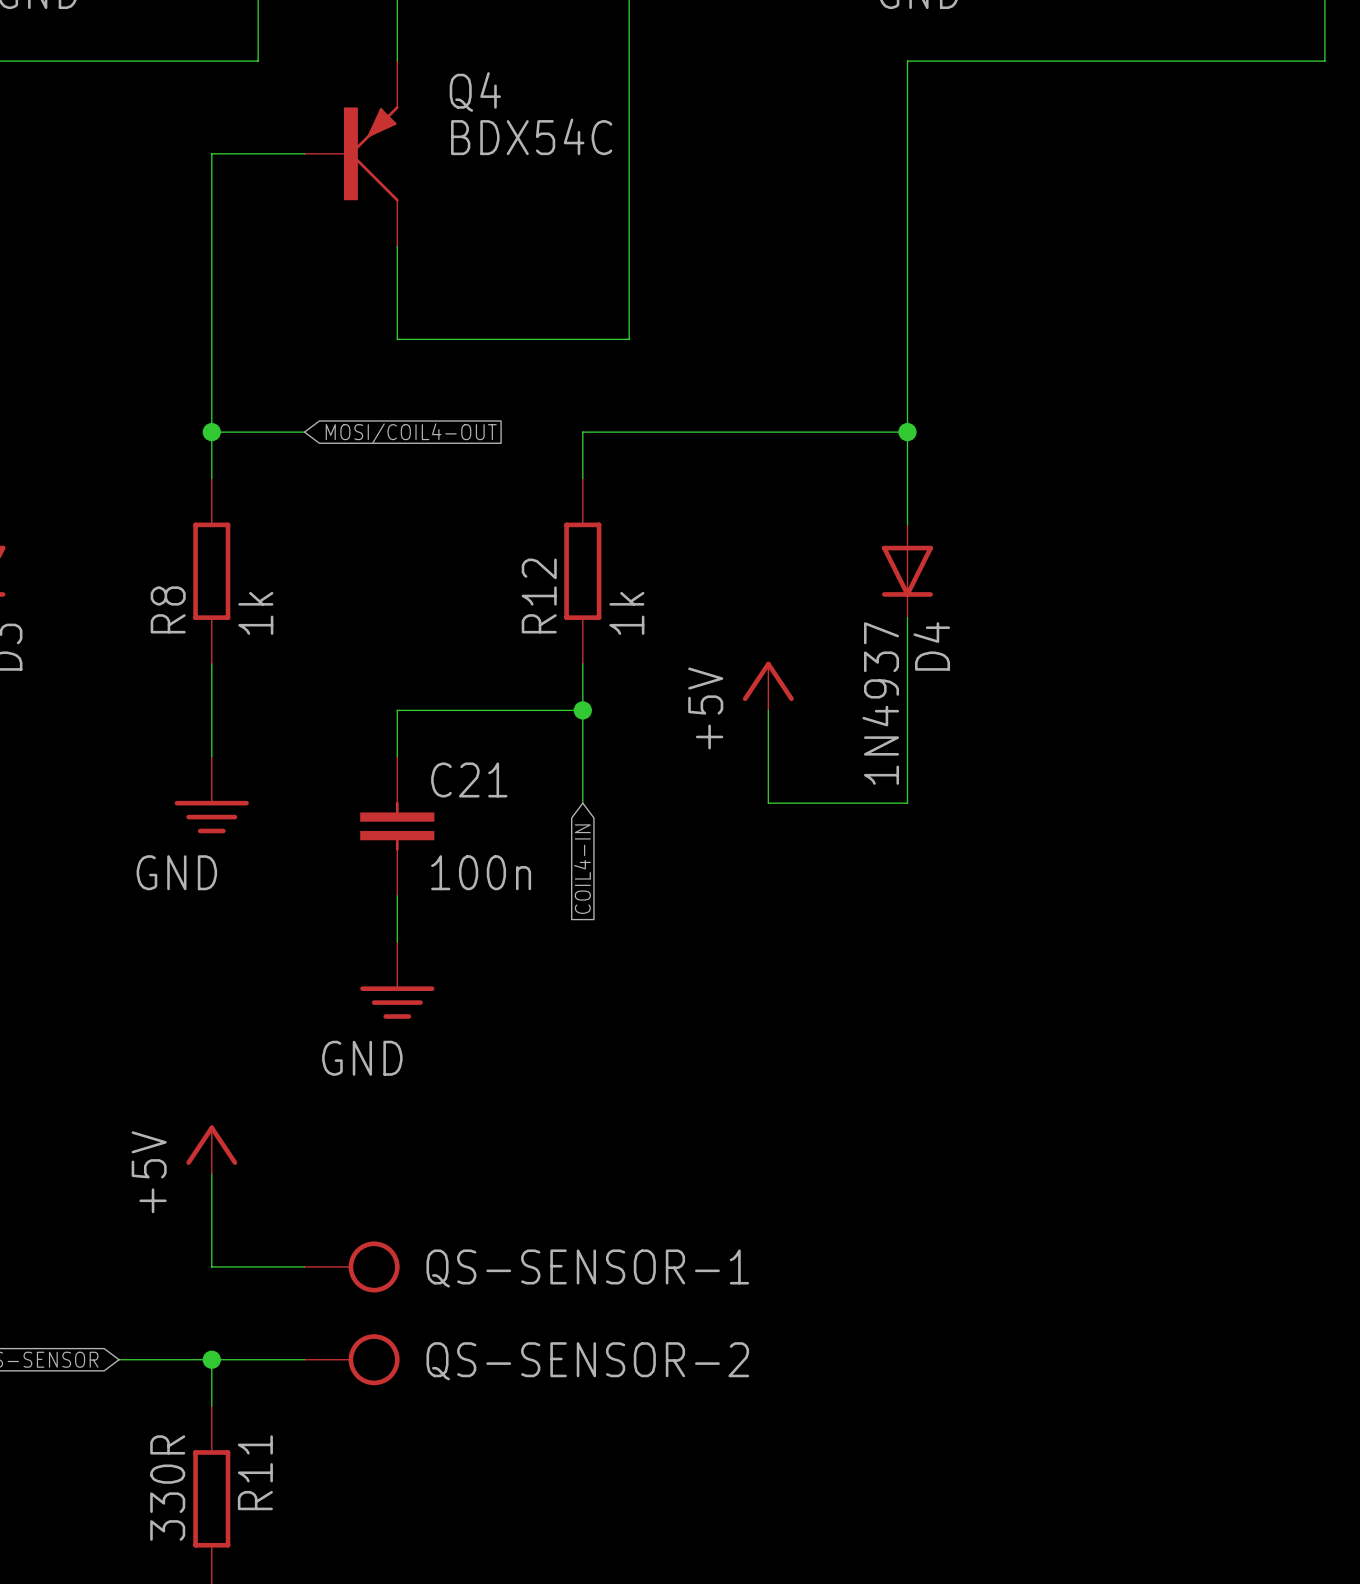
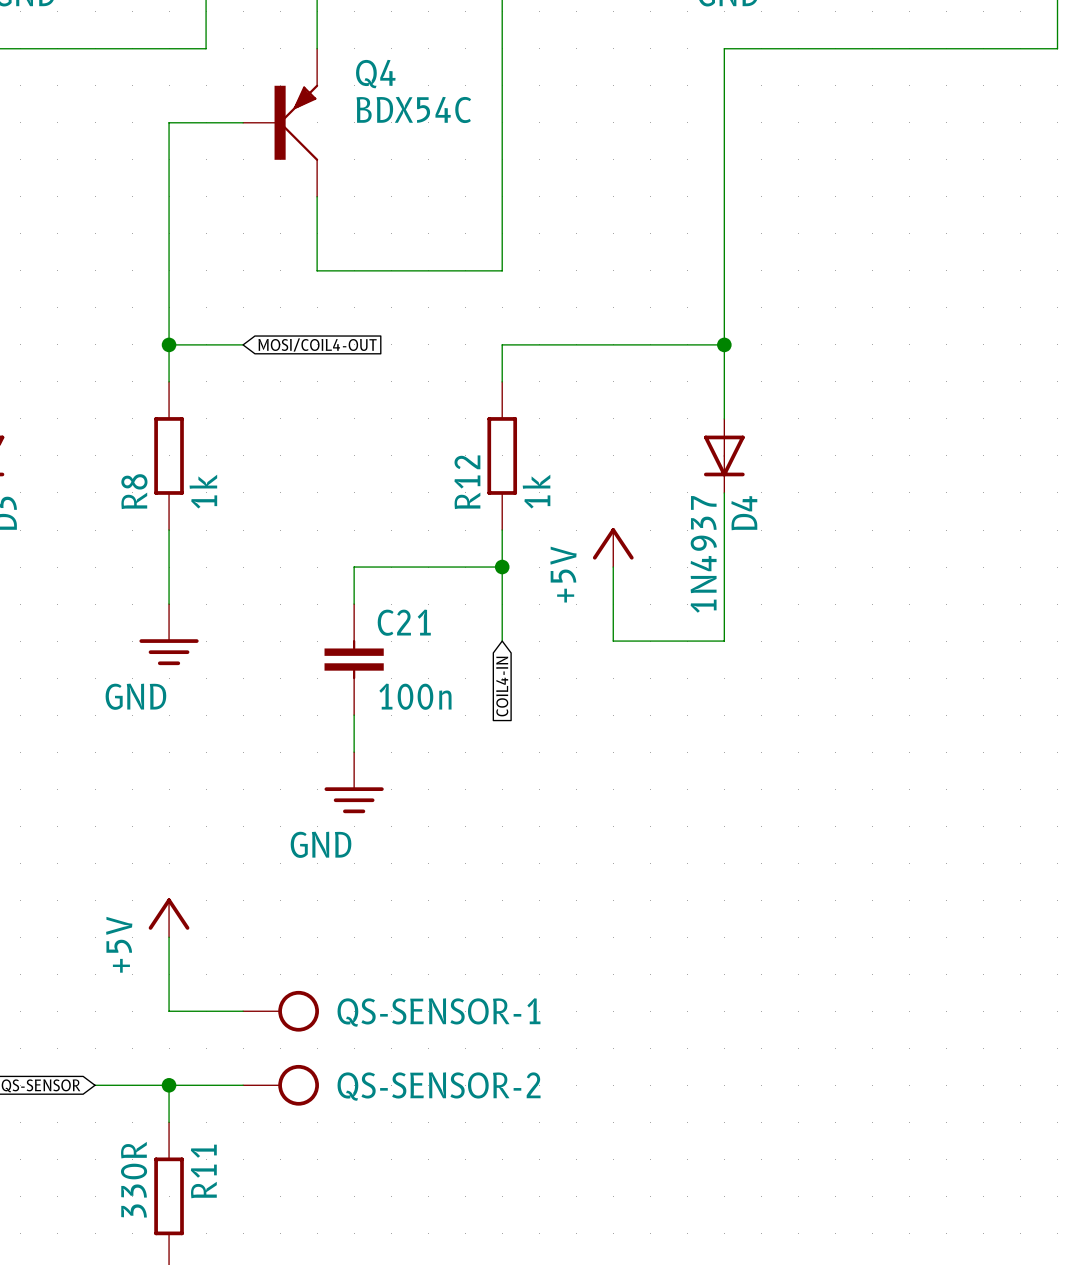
wire: (629, 432) (582, 432) (582, 478) -> (502, 344) (502, 381)
R12 position: (582, 571) -> (502, 455)
wire: (582, 664) (582, 803) -> (502, 530) (502, 641)
wire: (443, 710) (397, 710) (397, 756) -> (354, 567) (354, 604)
wire: none -> (465, 567) (502, 567)
junction position: (582, 710) -> (502, 567)
C21 position: (397, 826) -> (354, 659)
global label position: COIL4-IN (582, 869) -> COIL4-IN (502, 686)
wire: (397, 895) (397, 942) -> (354, 715) (354, 752)
power symbol position: GND (397, 980) -> GND (354, 782)

